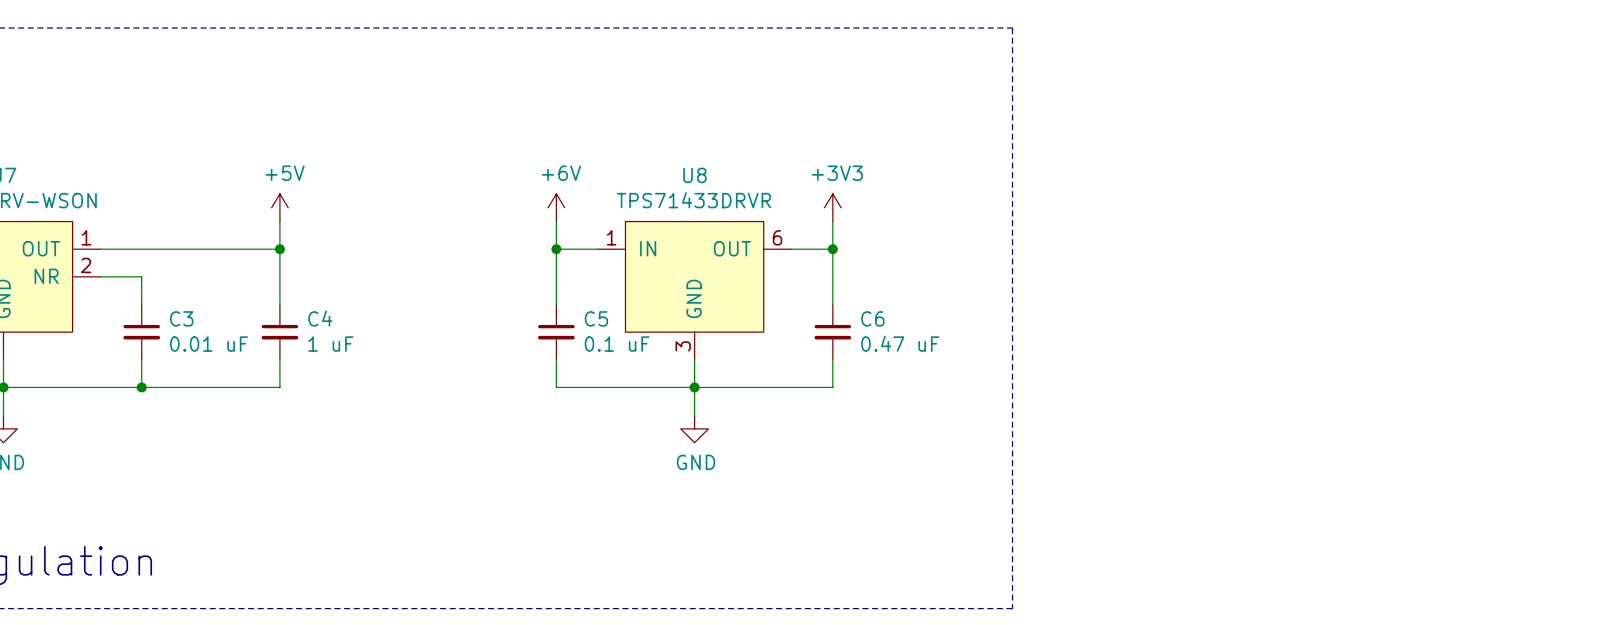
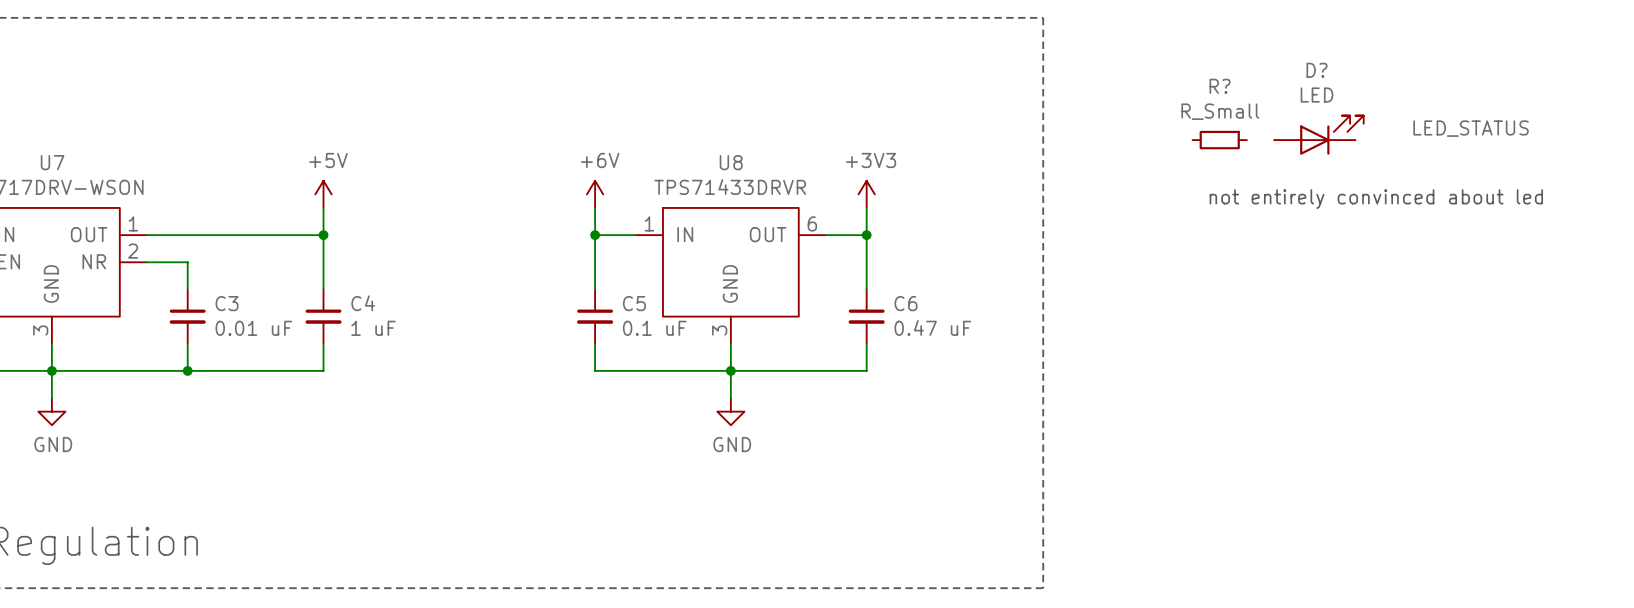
label: none -> LED_STATUS (1471, 128)
D?: none -> LED (1318, 135)
R?: none -> R_Small (1219, 140)
text: none -> not entirely convinced about led (1376, 199)

